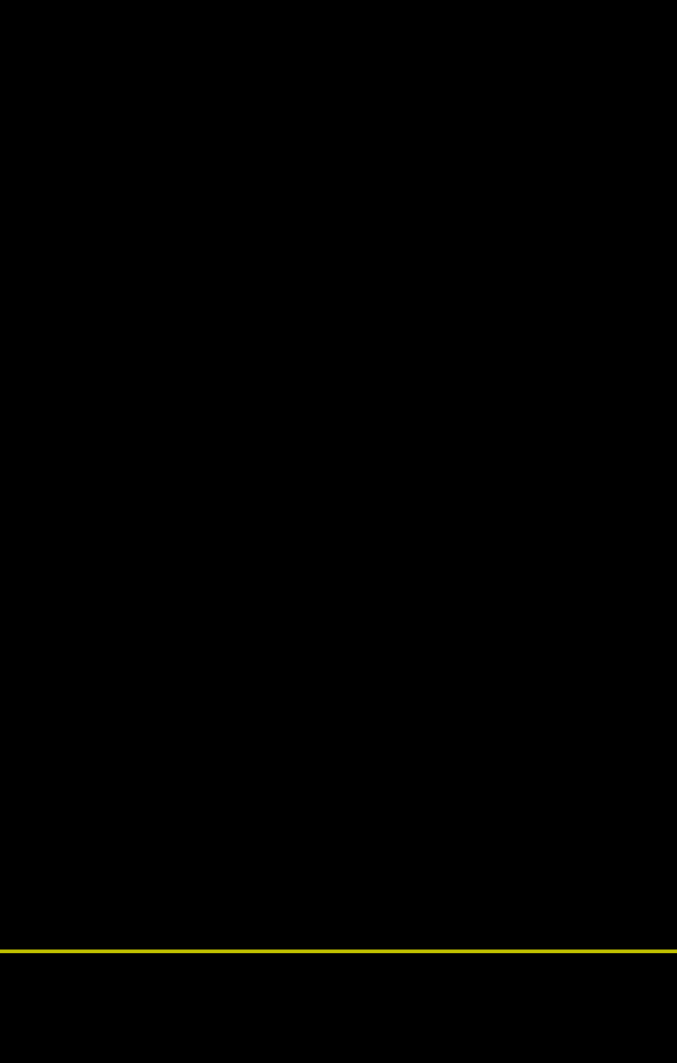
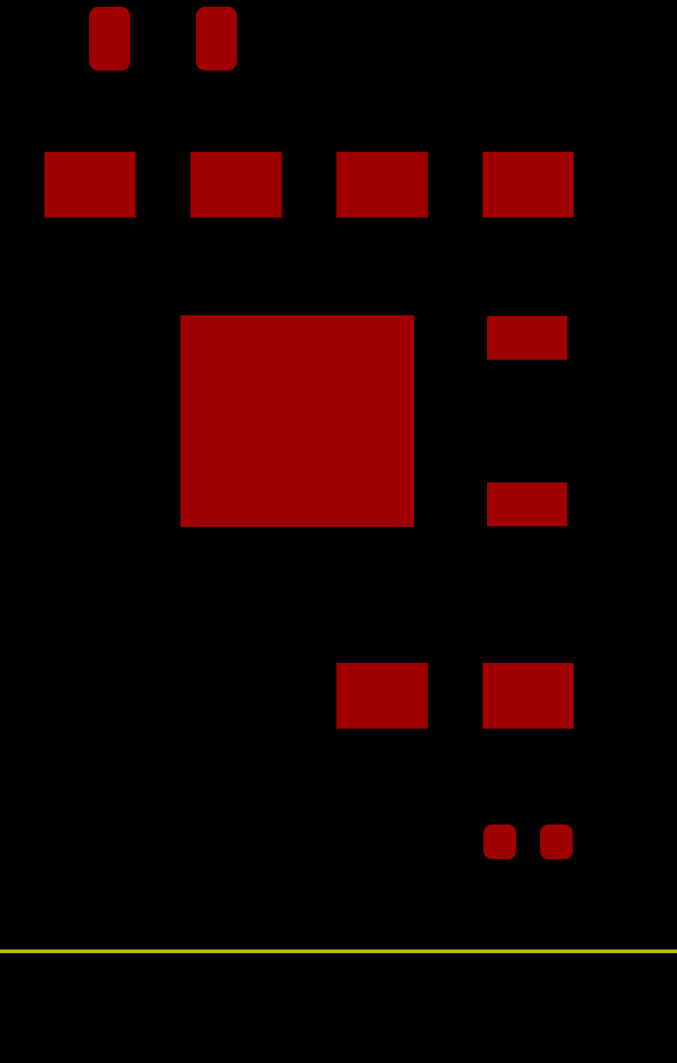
part: none -> (163, 38)
part: none -> (163, 184)
part: none -> (455, 184)
part: none -> (373, 421)
part: none -> (455, 695)
part: none -> (528, 841)

